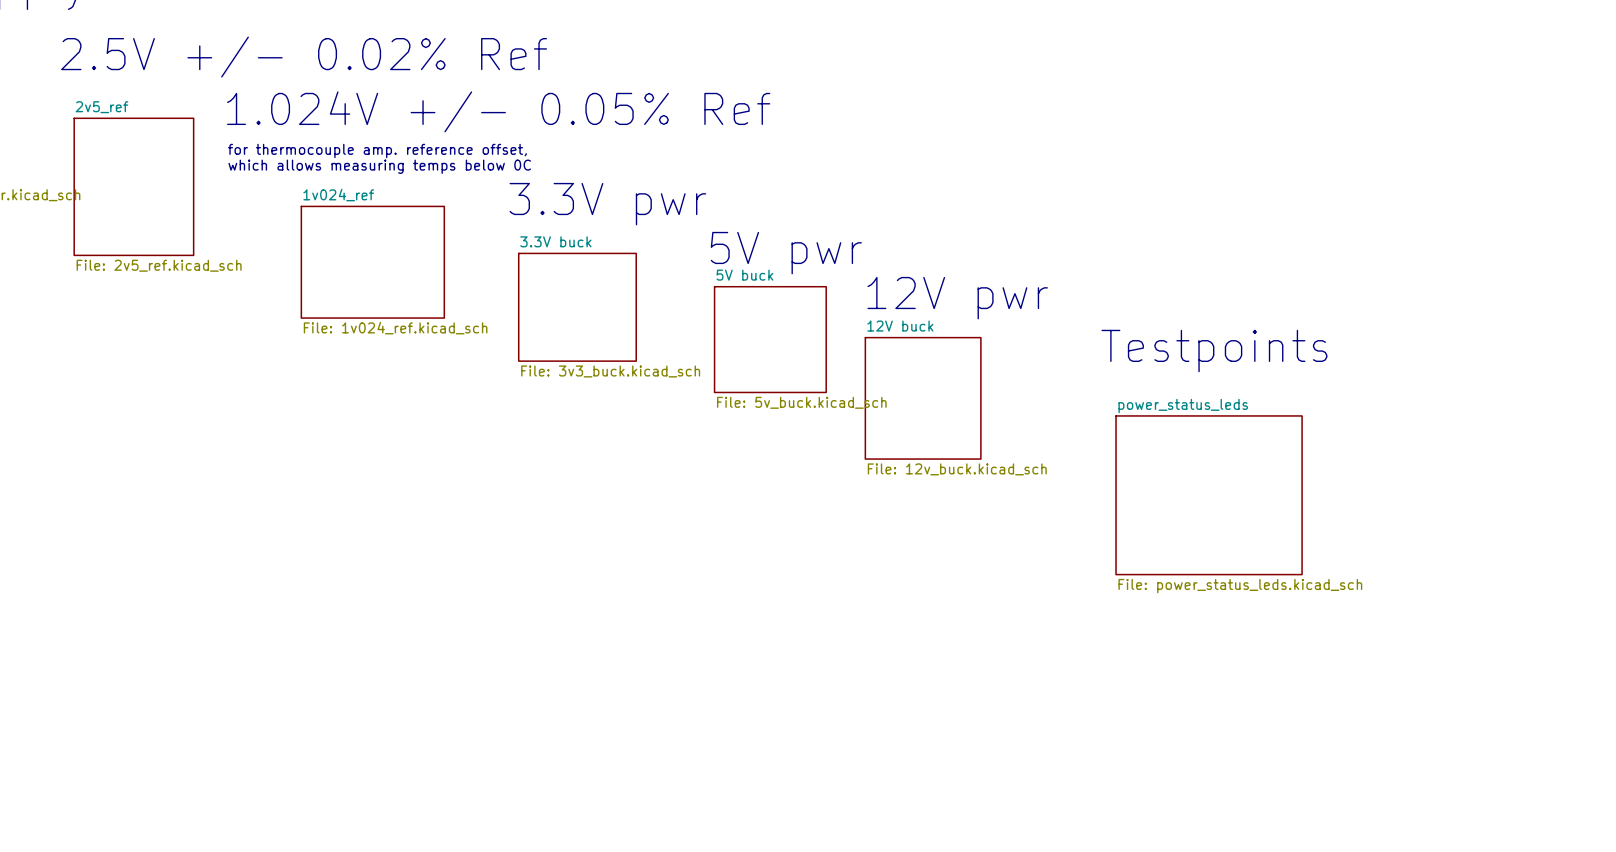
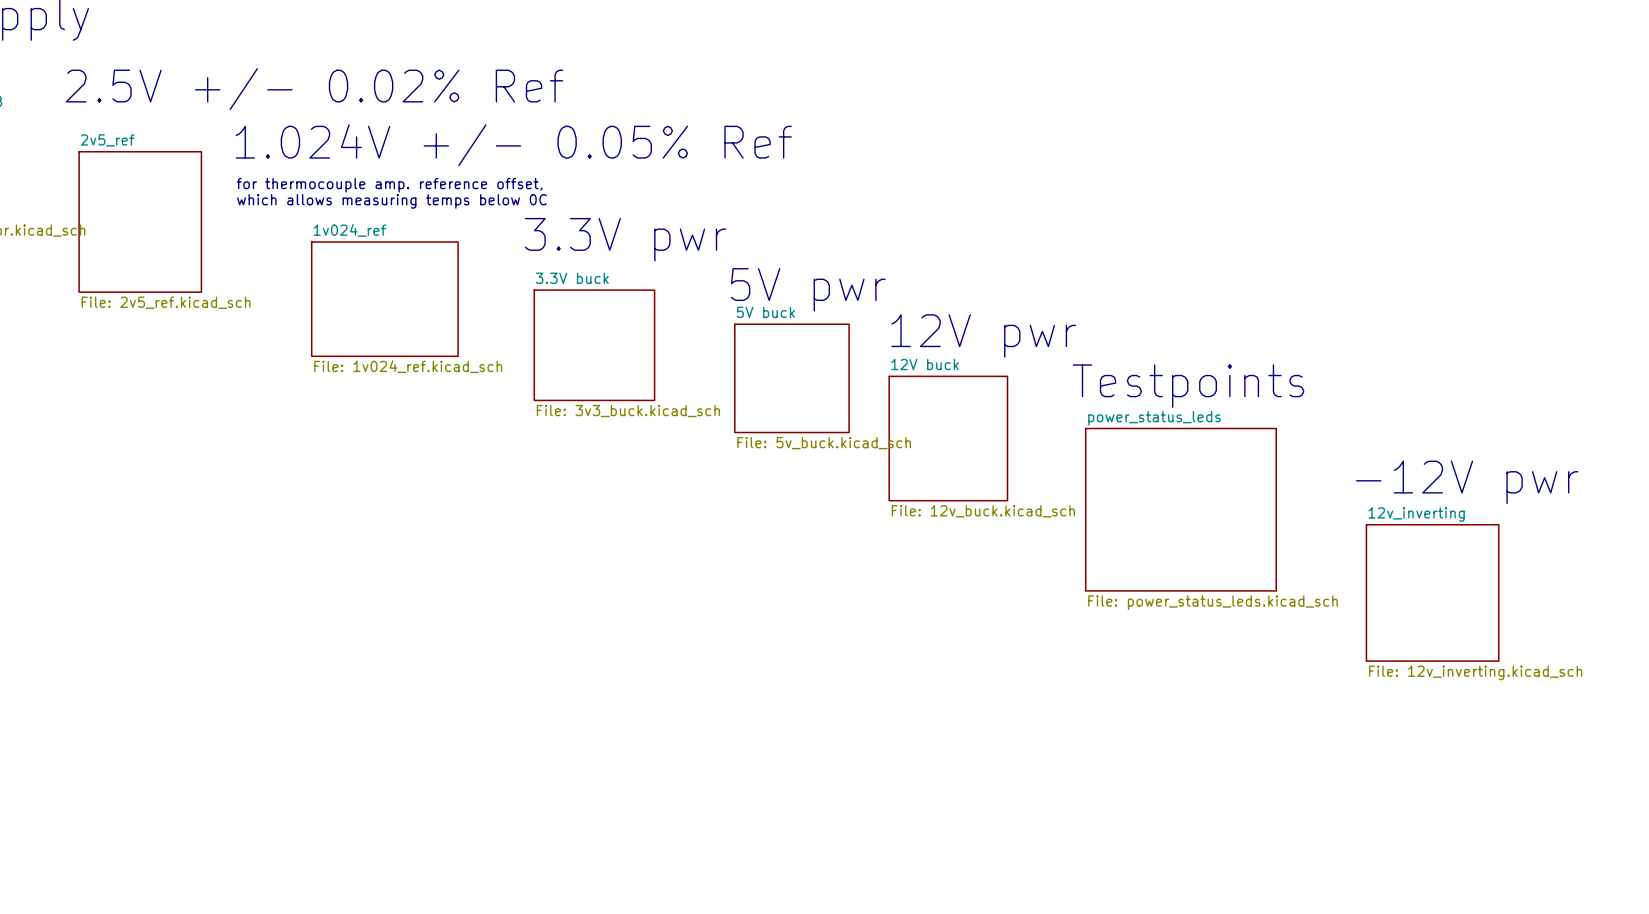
text position: Testpoints (1214, 351) -> Testpoints (1188, 386)
text: none -> -12V pwr (1467, 482)
sheet power_status_leds position: (1209, 495) -> (1180, 509)
sheet 12v_inverting: none -> File: 12v_inverting.kicad_sch (1432, 592)

